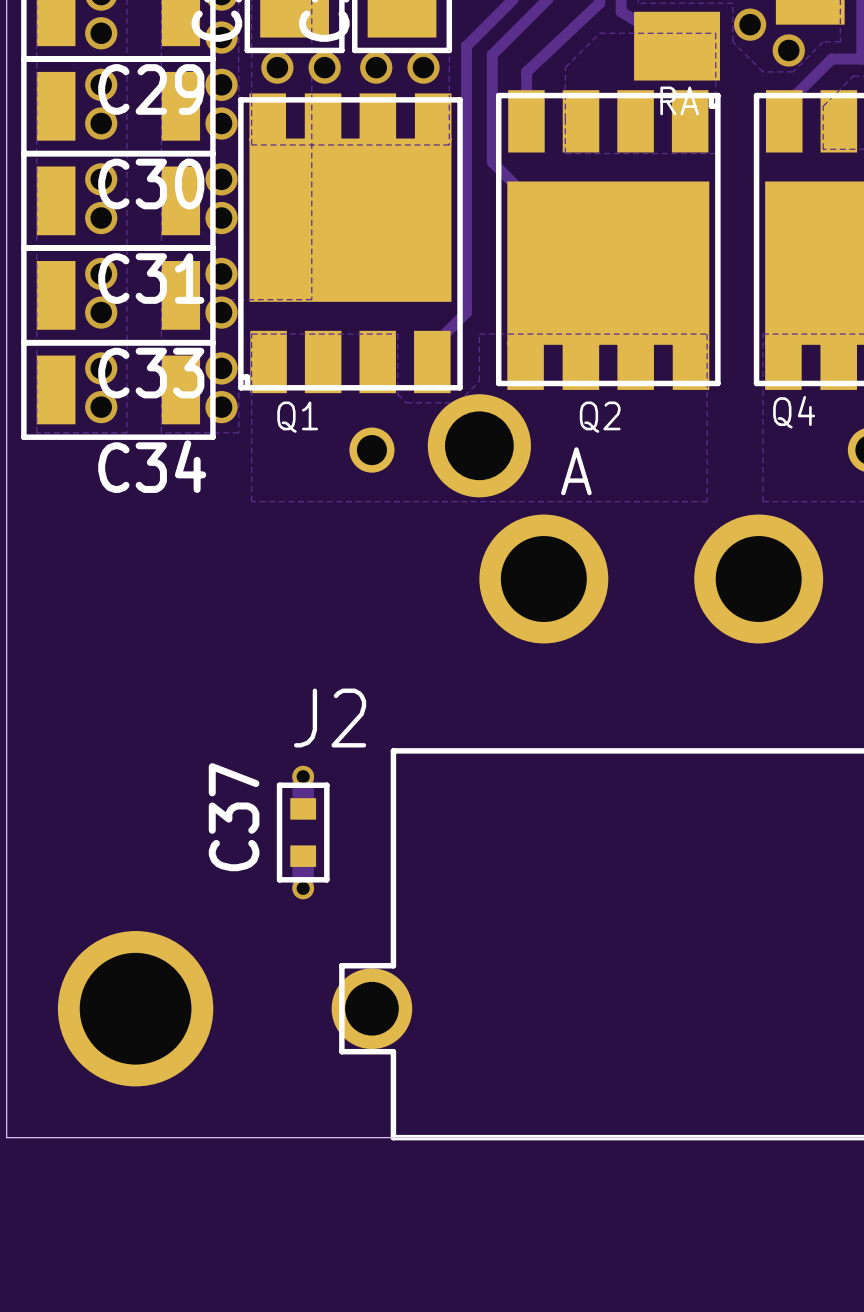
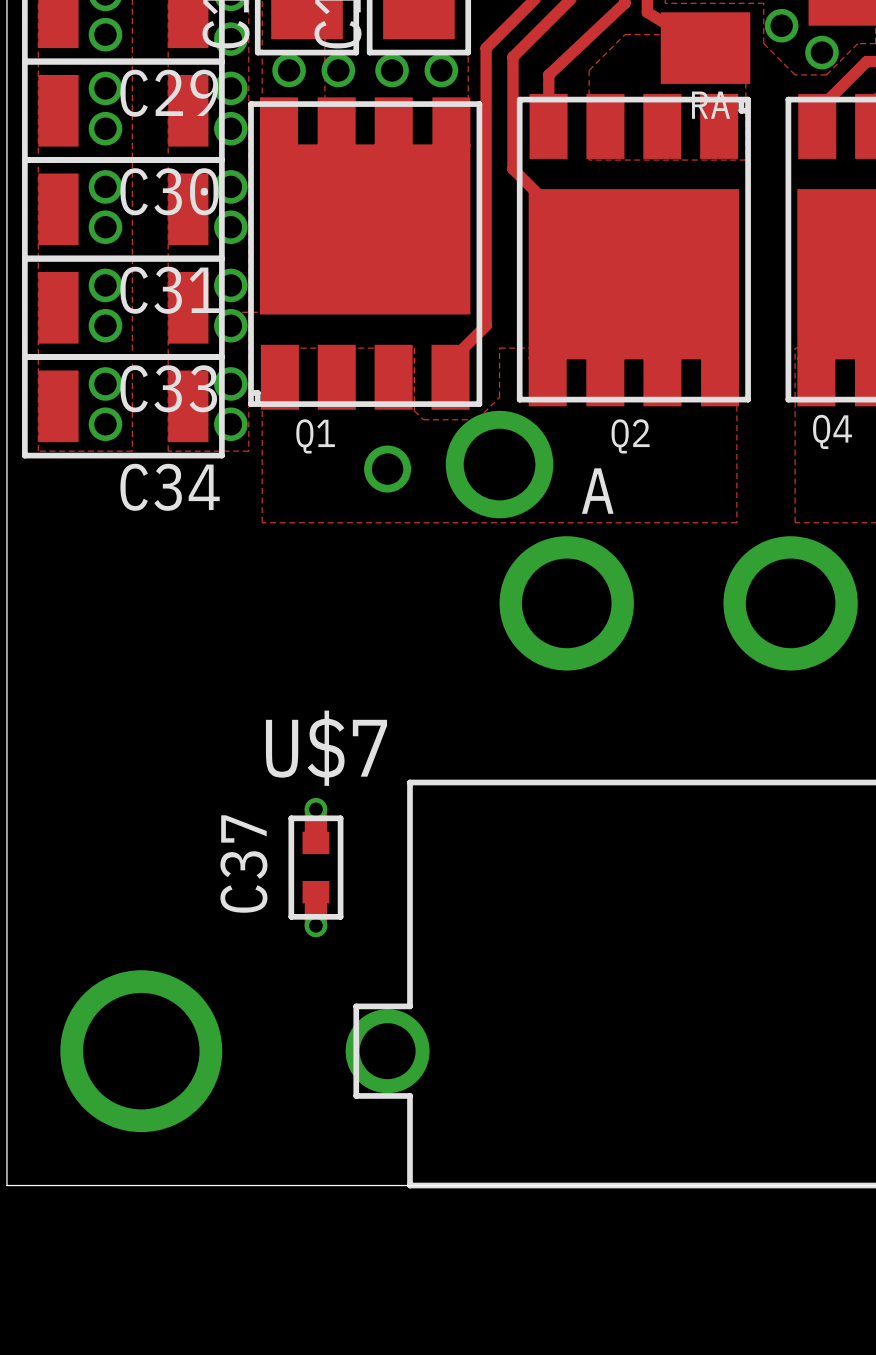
J2 name: J2 (330, 718) -> U$7 (326, 748)

